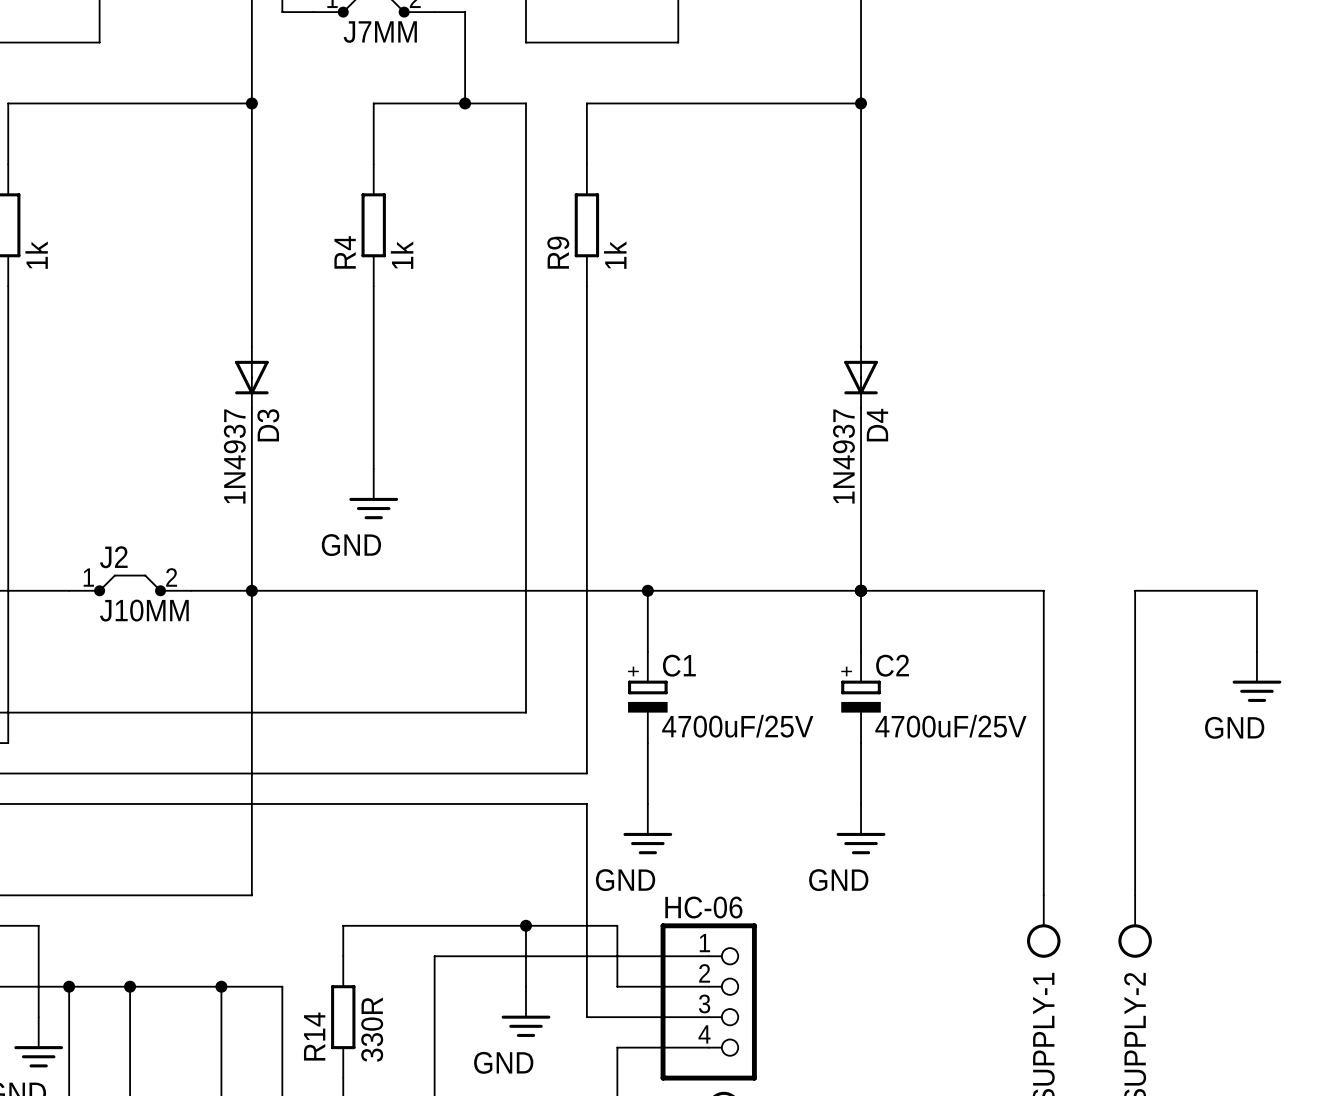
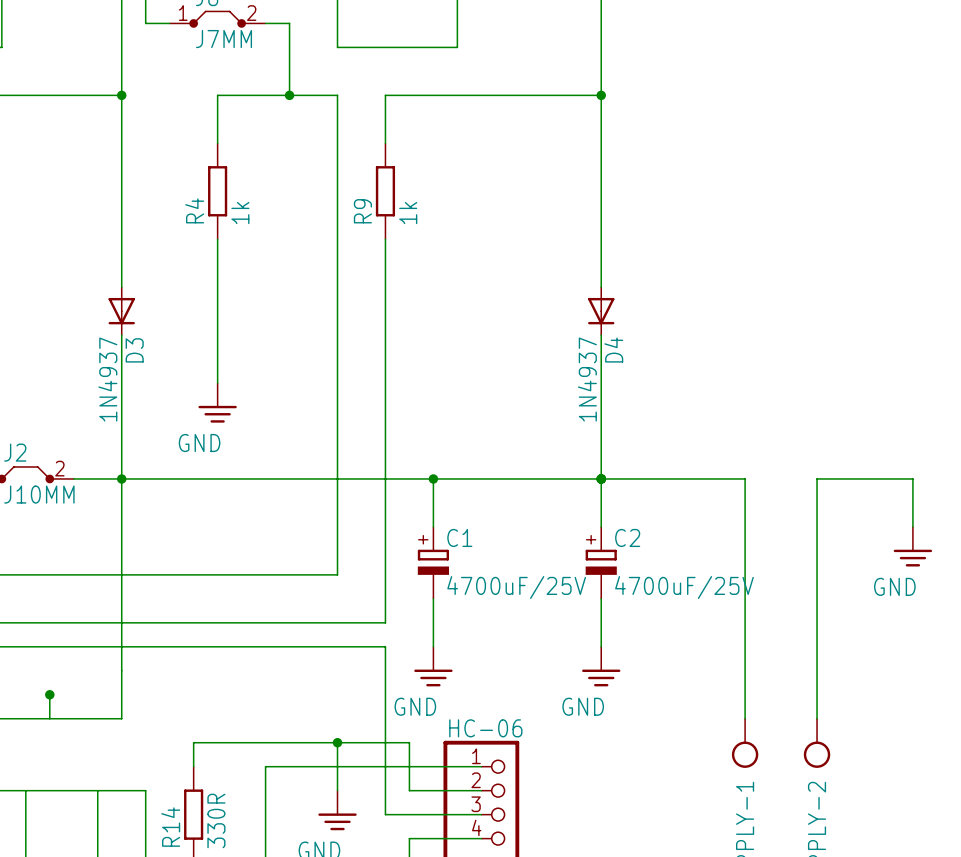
wire: none -> (49, 694) (49, 718)
junction: none -> (49, 694)
junction: (130, 986) -> none
junction: (221, 986) -> none

